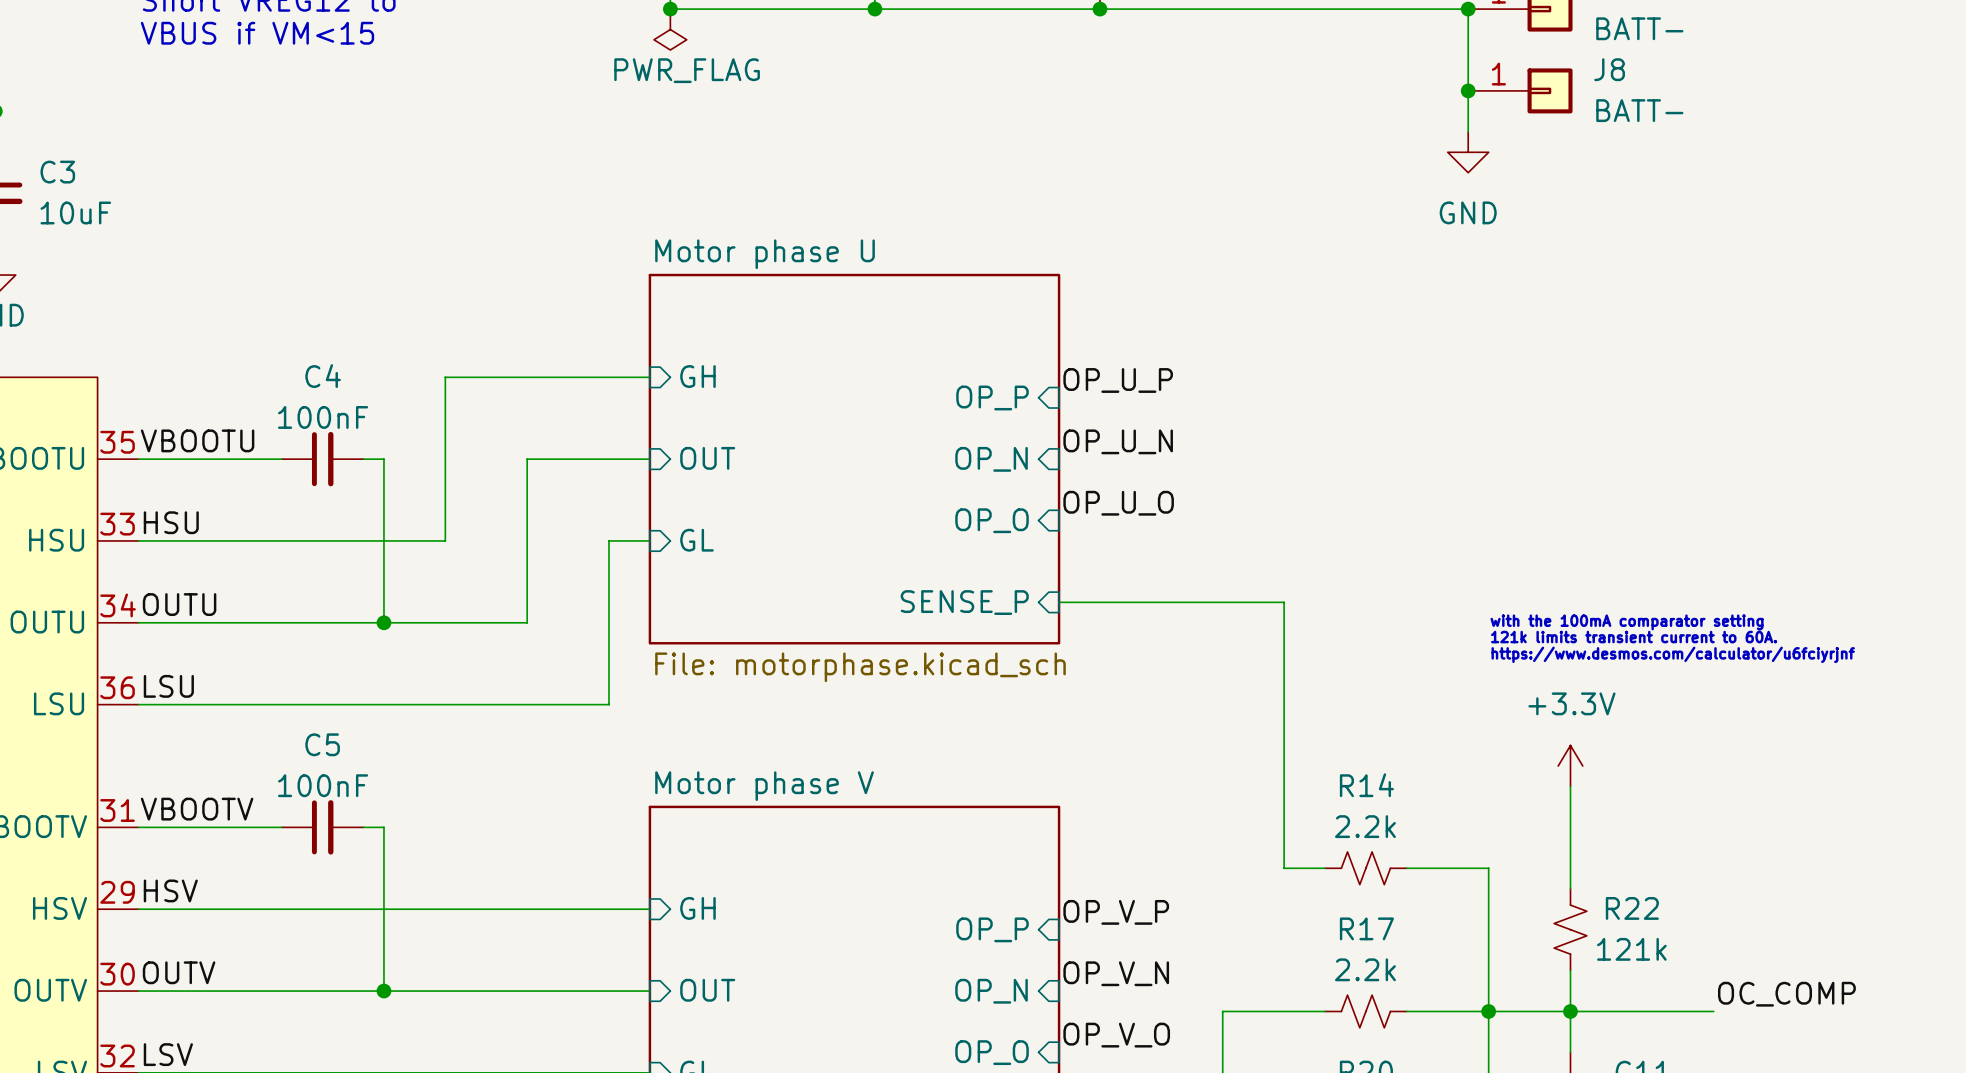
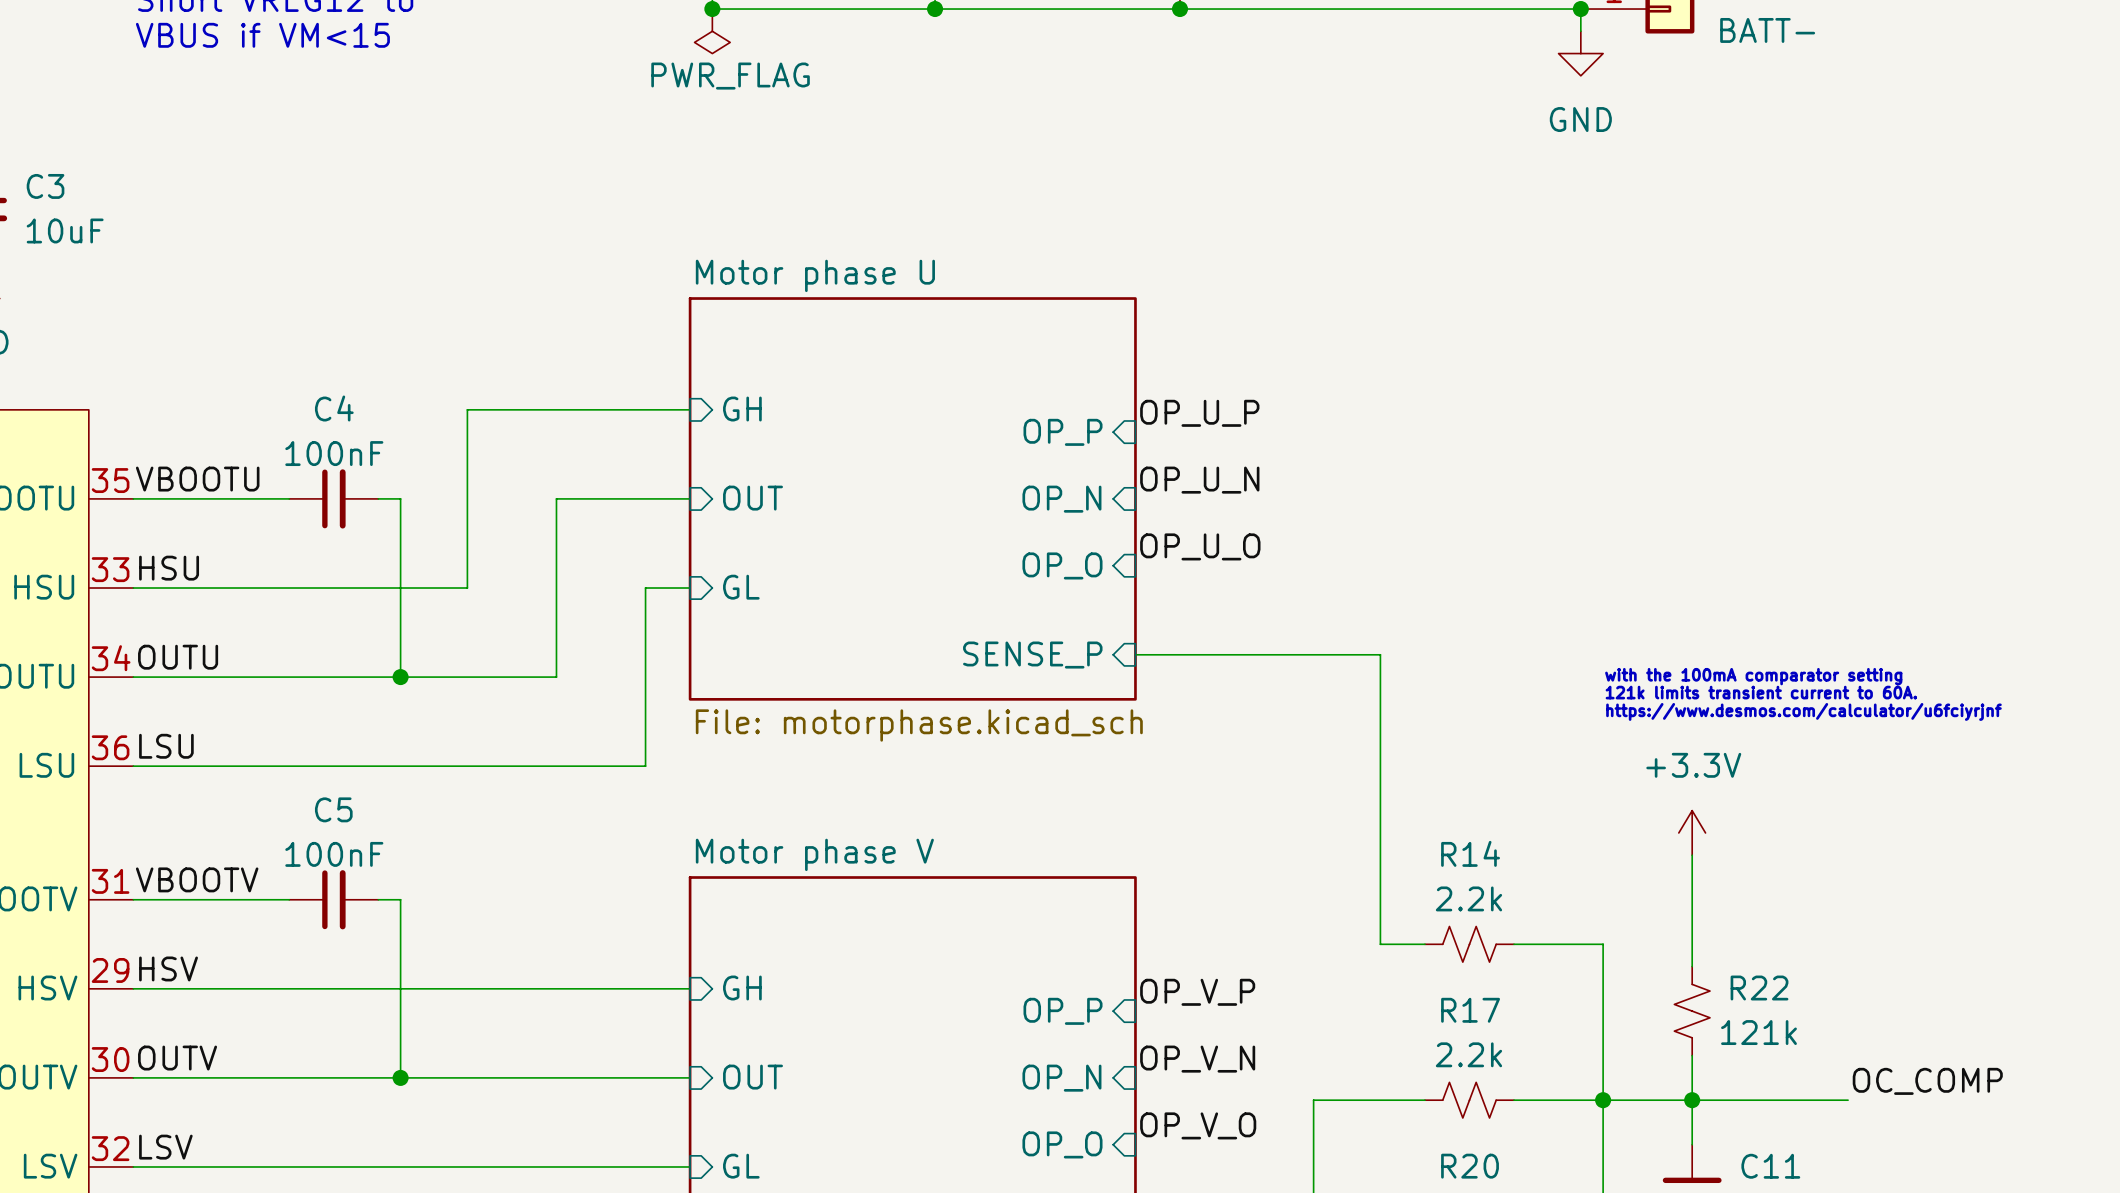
wire: (1468, 29) (1468, 131) -> none
junction: (1468, 90) -> none
J8: BATT- (1520, 90) -> none
power symbol position: GND (1468, 152) -> GND (1580, 53)

